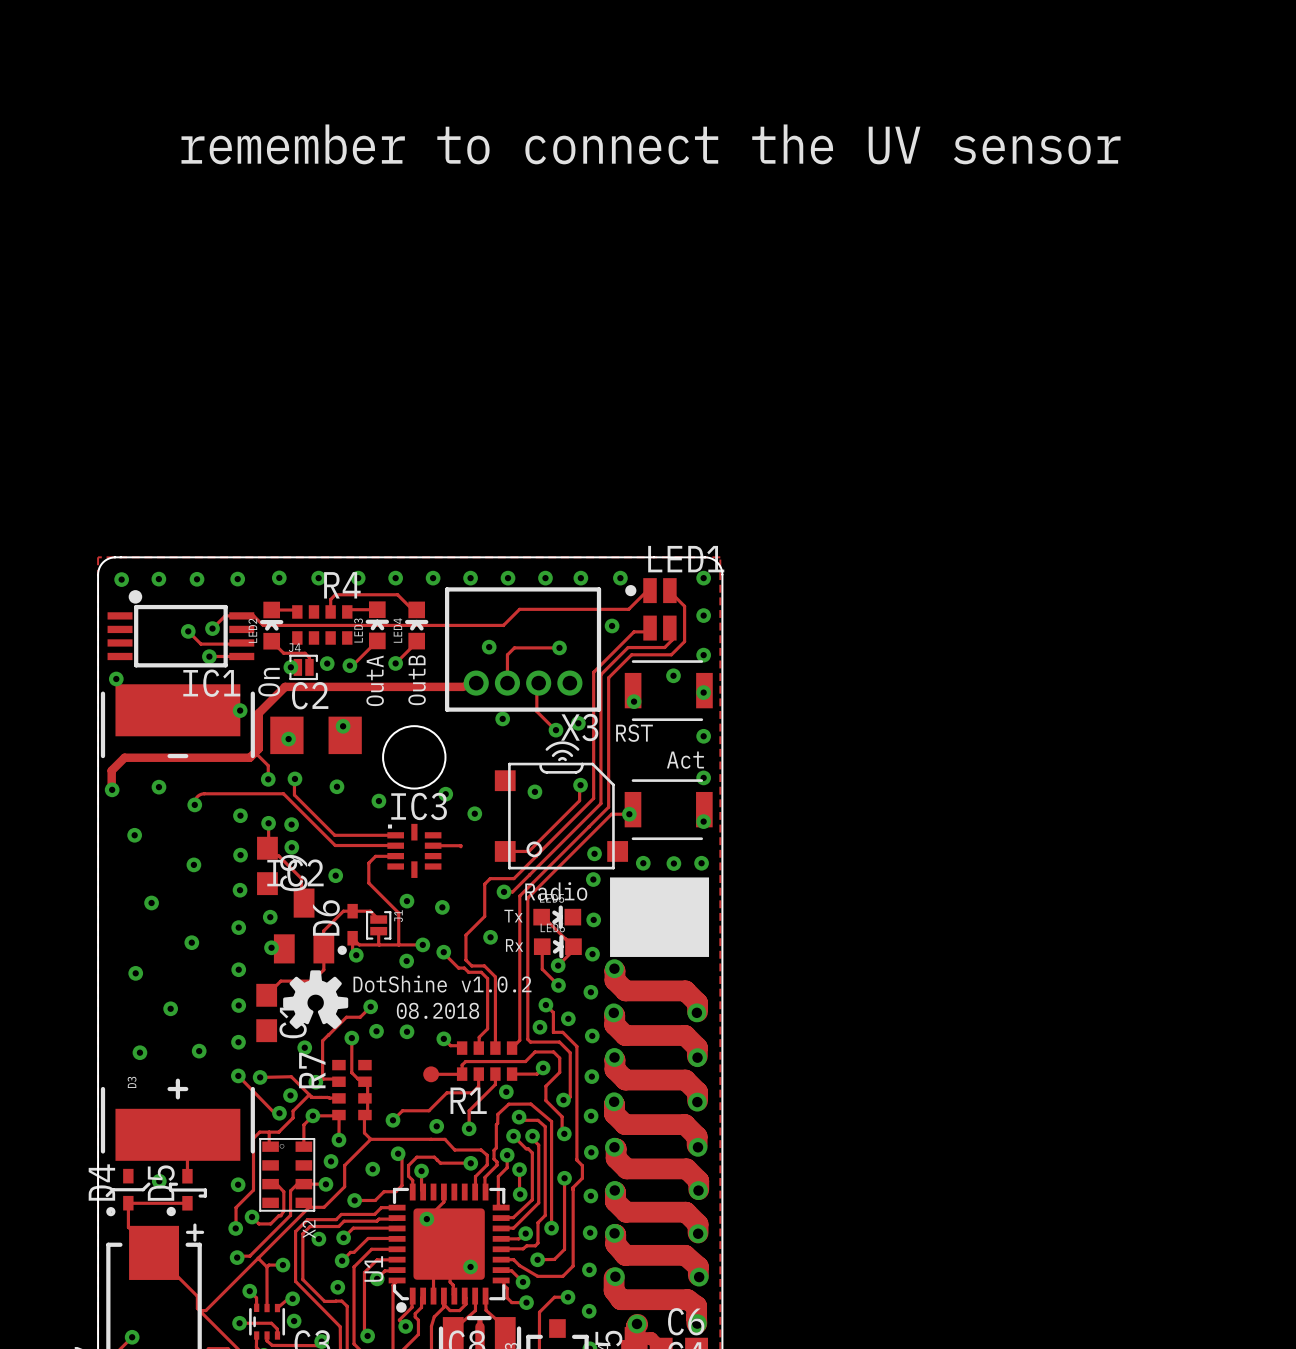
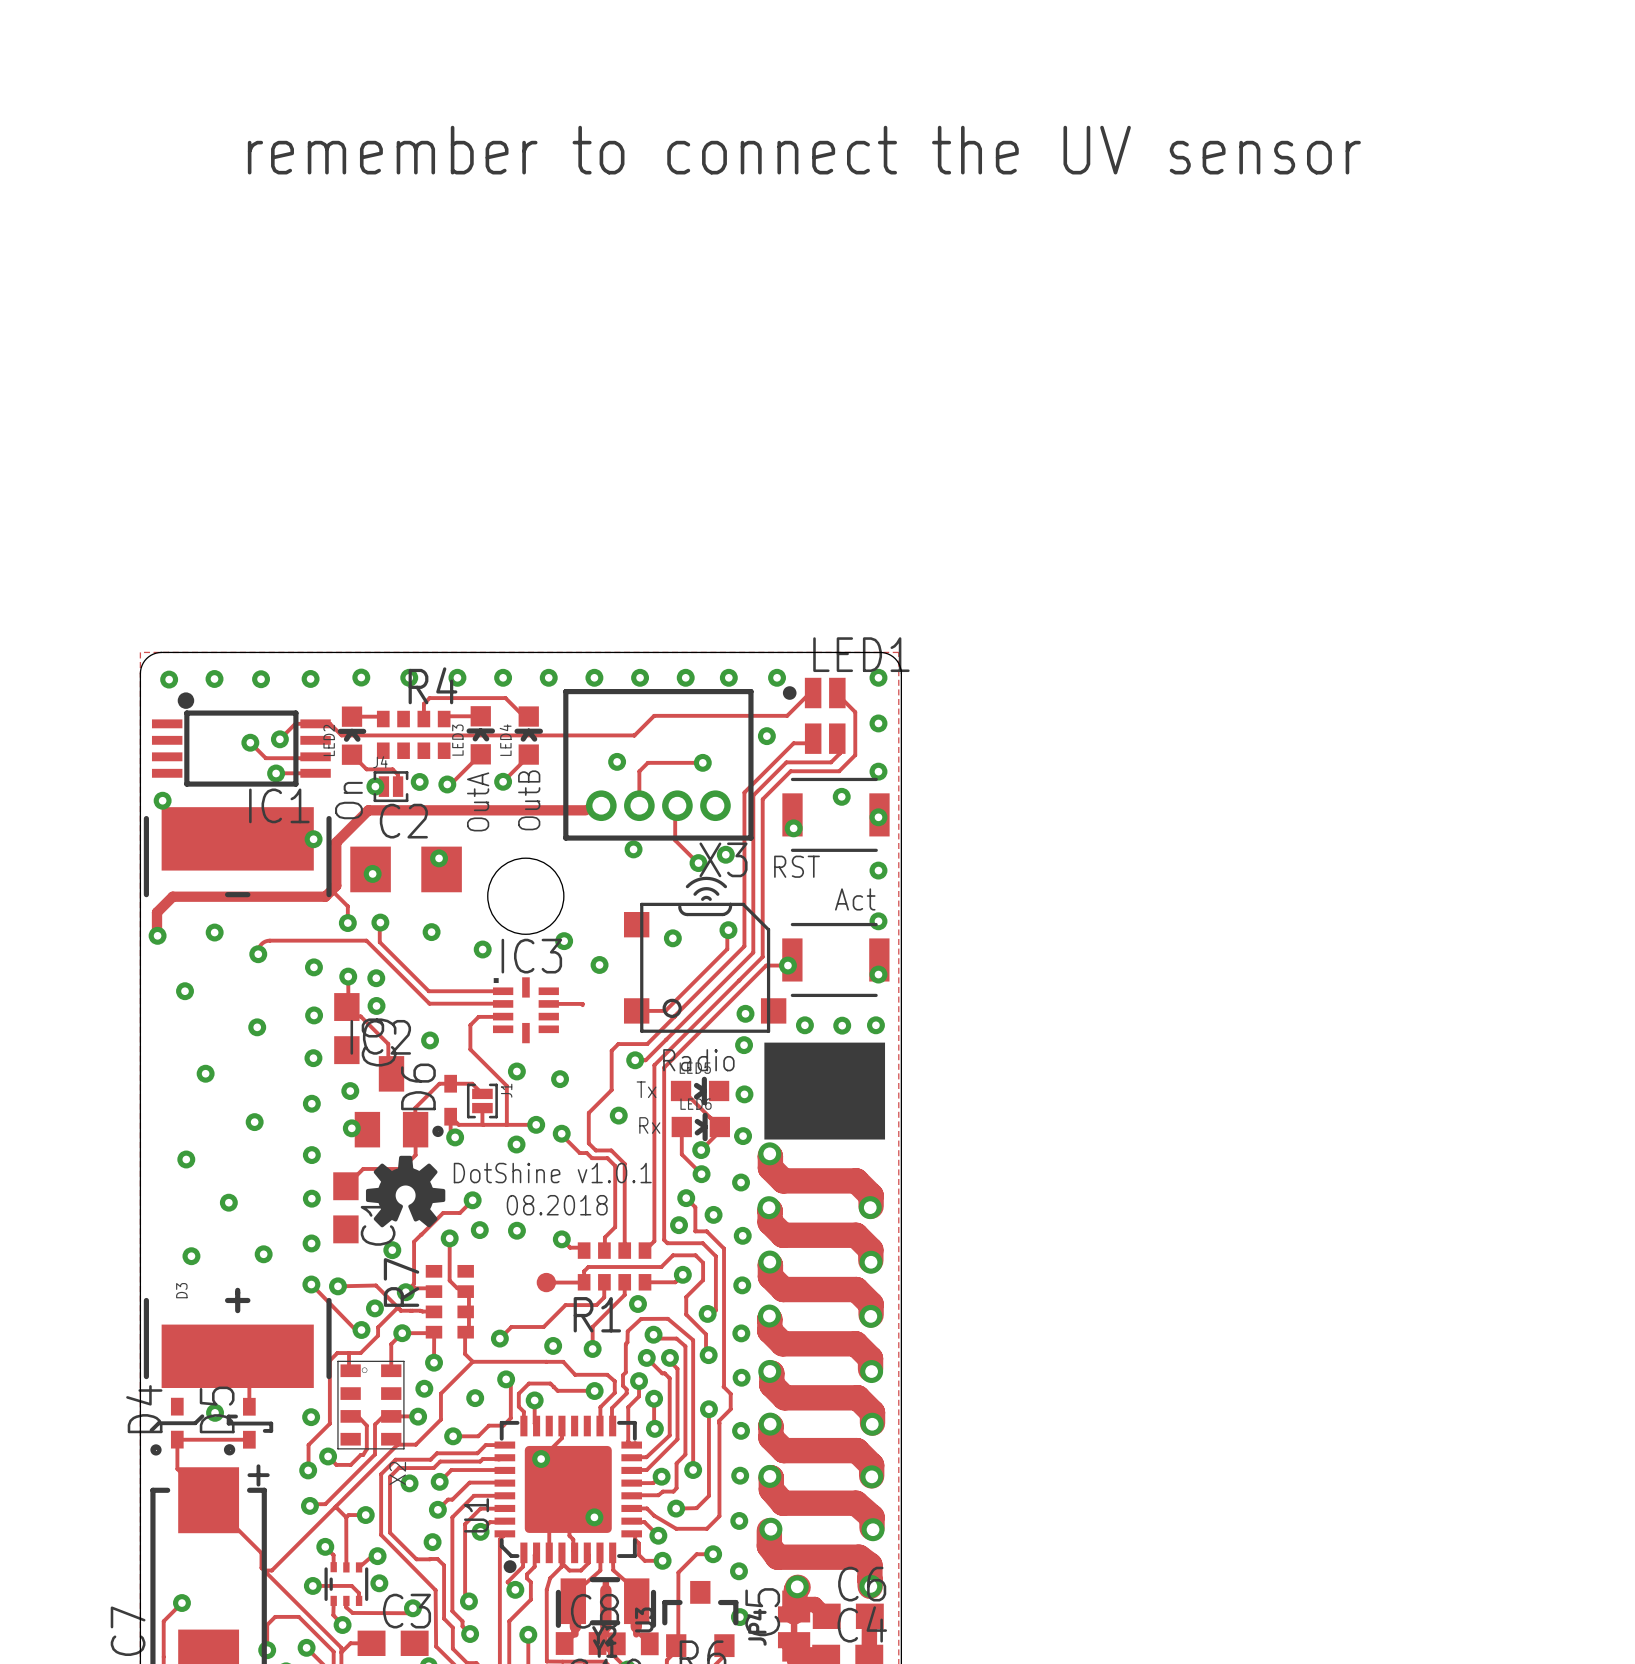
text: DotShine v1.0.2 (442, 984) -> DotShine v1.0.1 (552, 1173)

